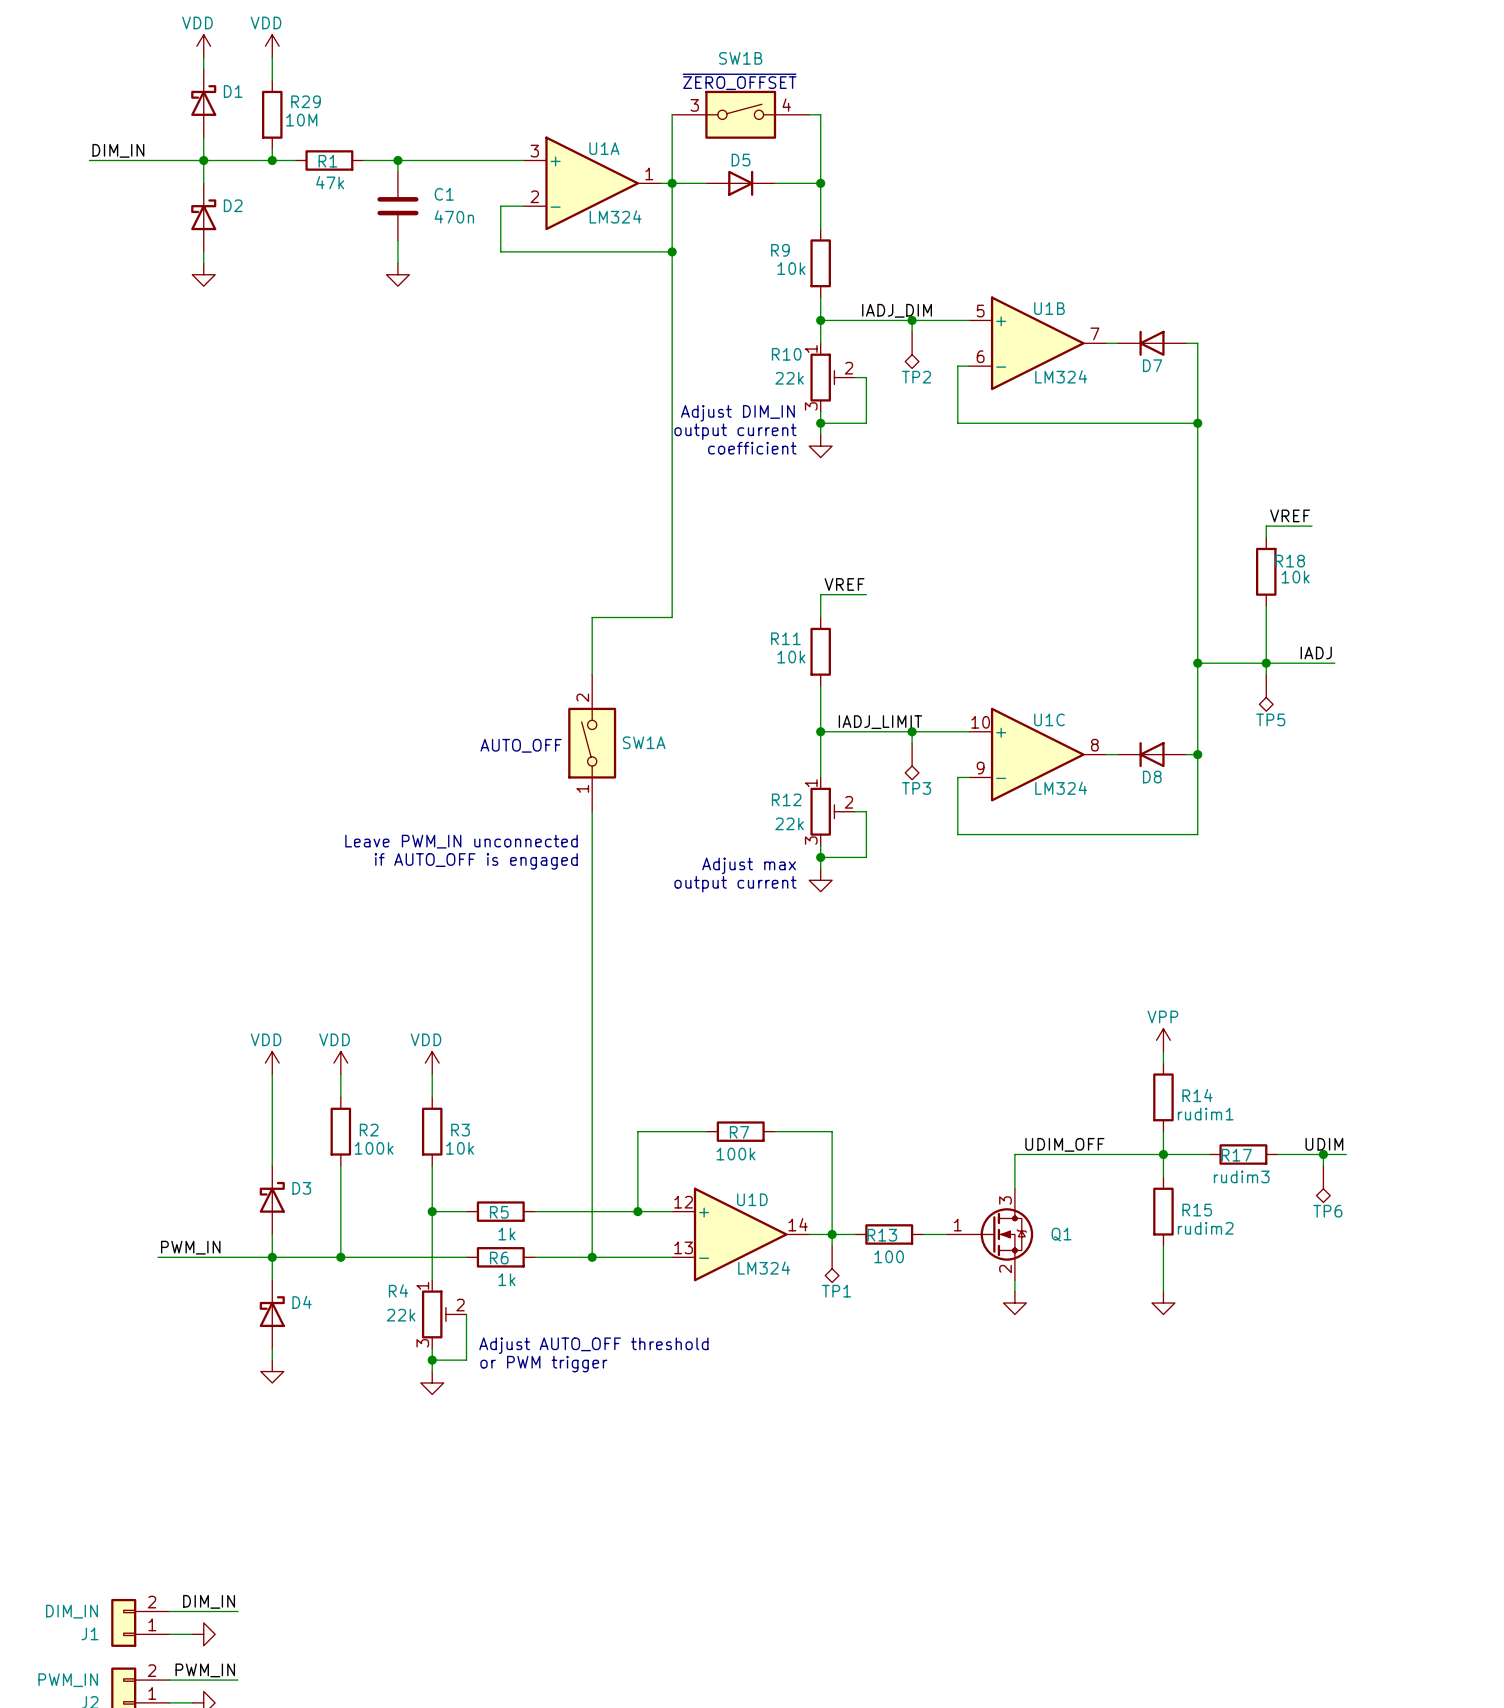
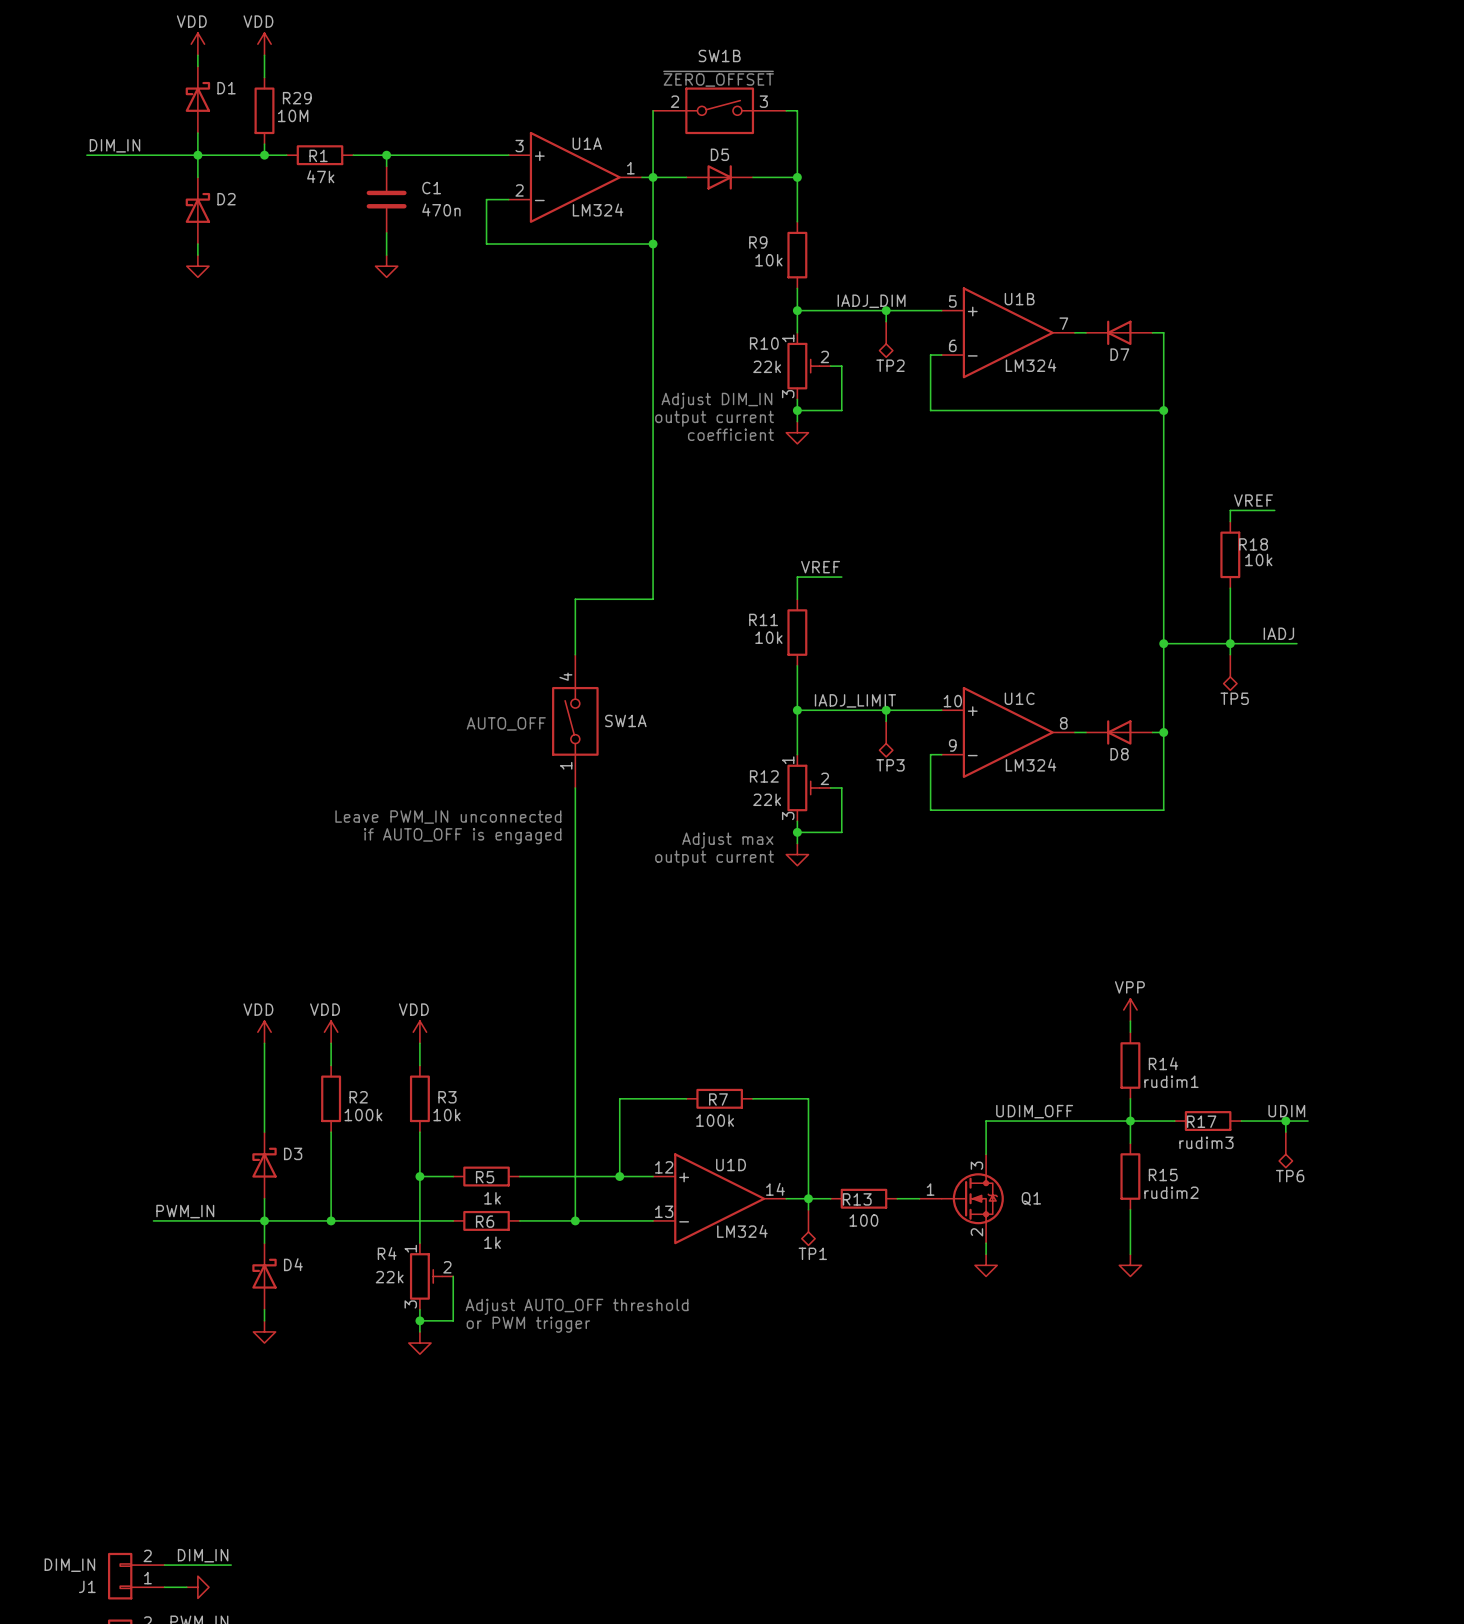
SW1B pin number: 3 (694, 105) -> 2 (674, 101)
SW1B pin number: 4 (786, 105) -> 3 (763, 101)
SW1A pin number: 2 (582, 697) -> 4 (565, 676)

